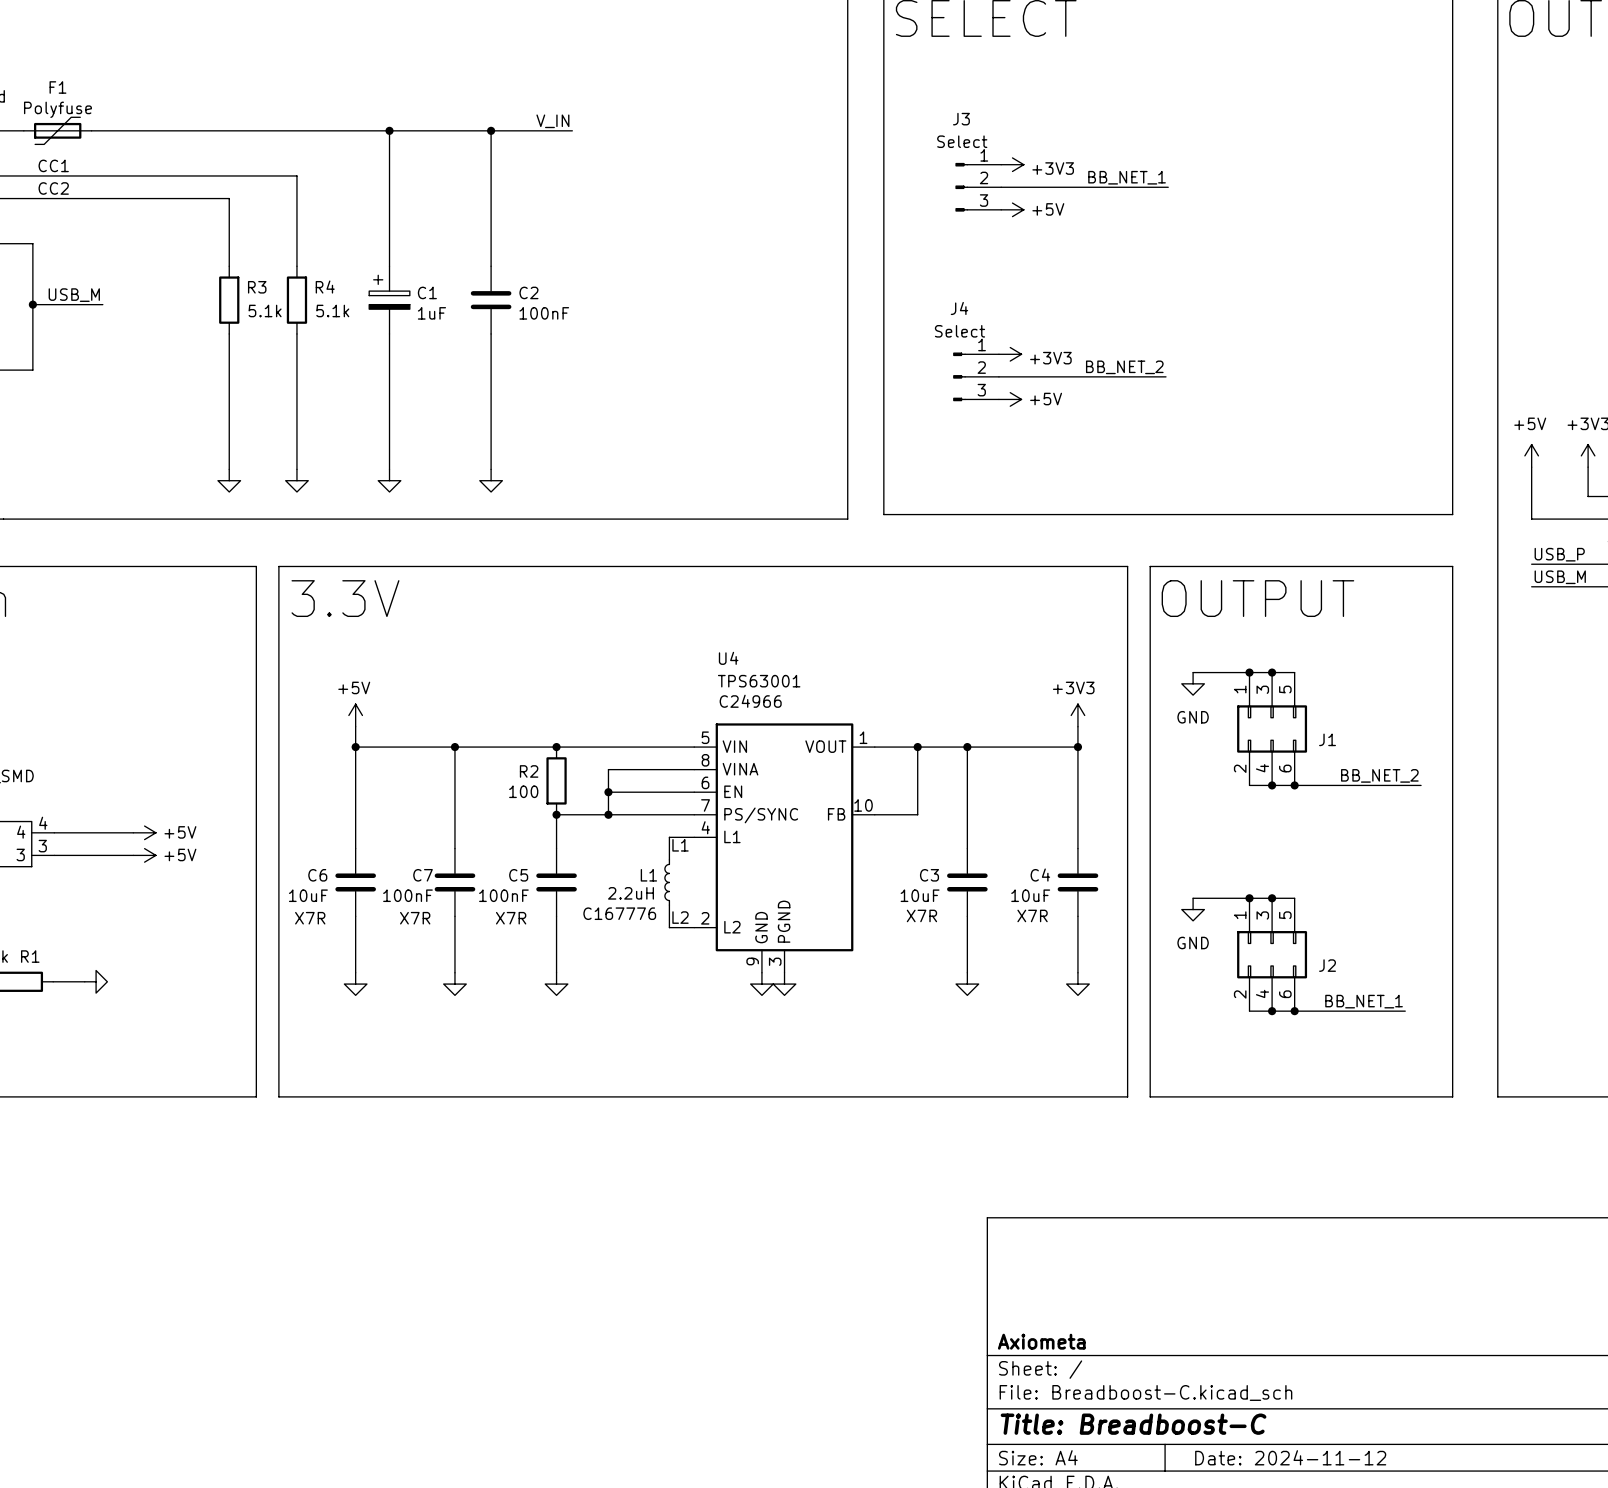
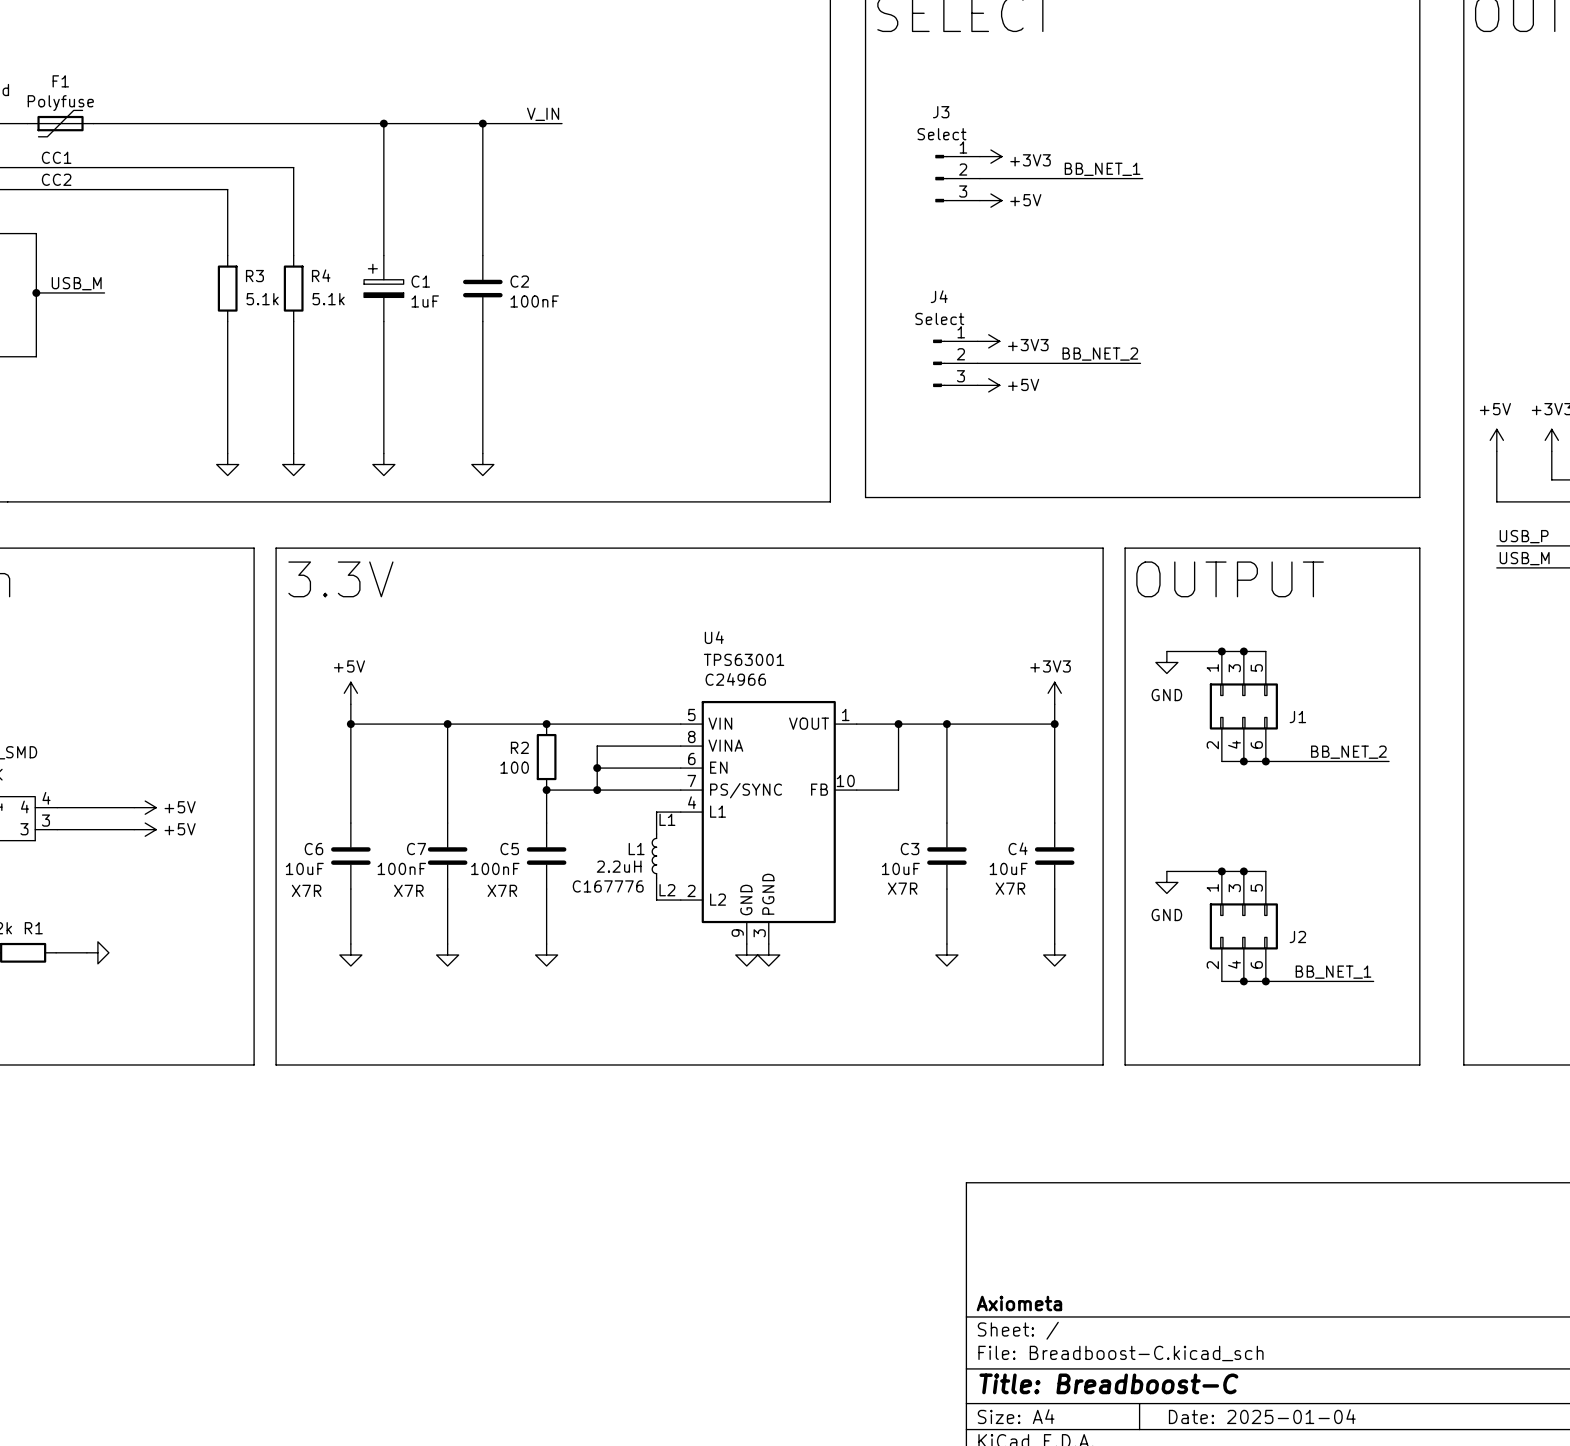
title block: Date: 2024-11-12 (1290, 1457) -> Date: 2025-01-04 (1262, 1416)

